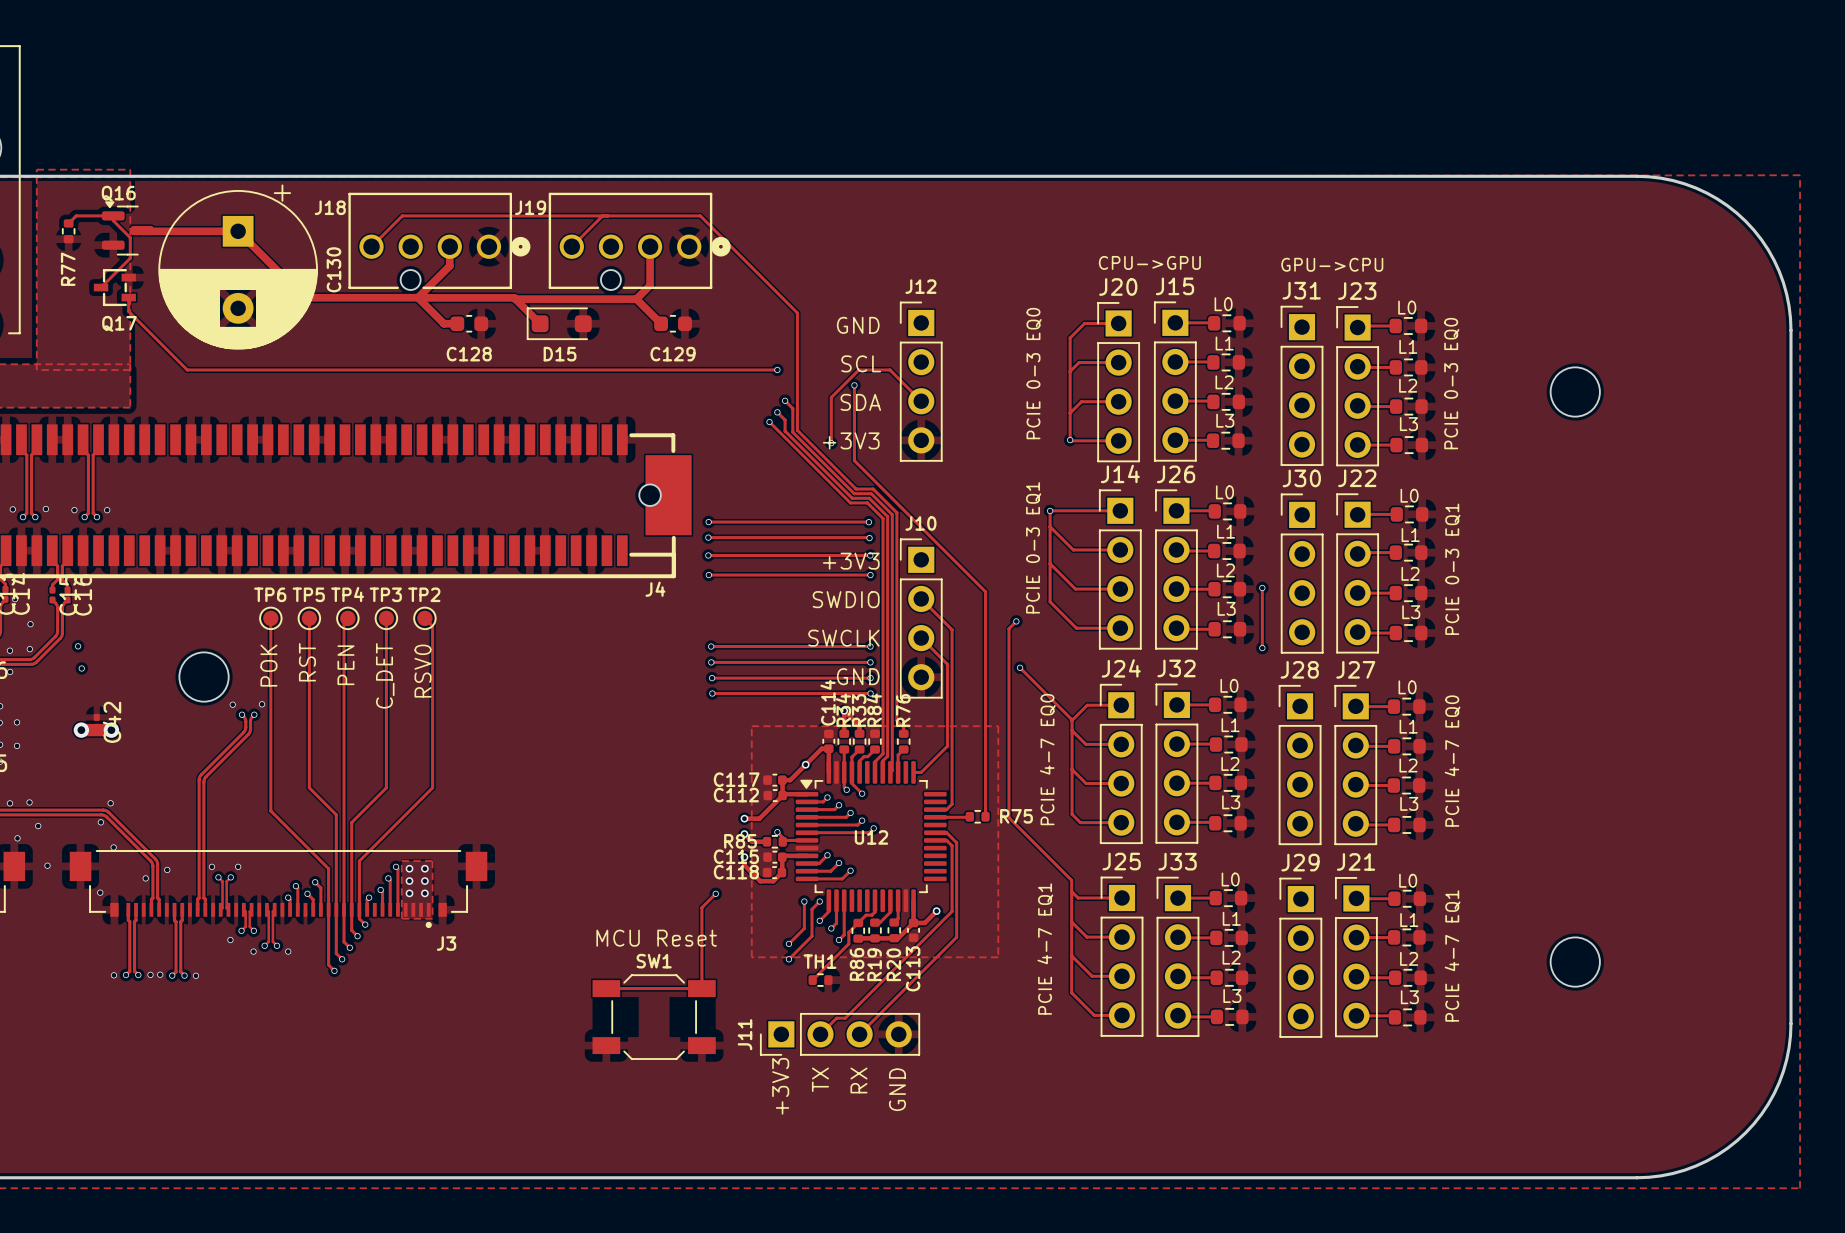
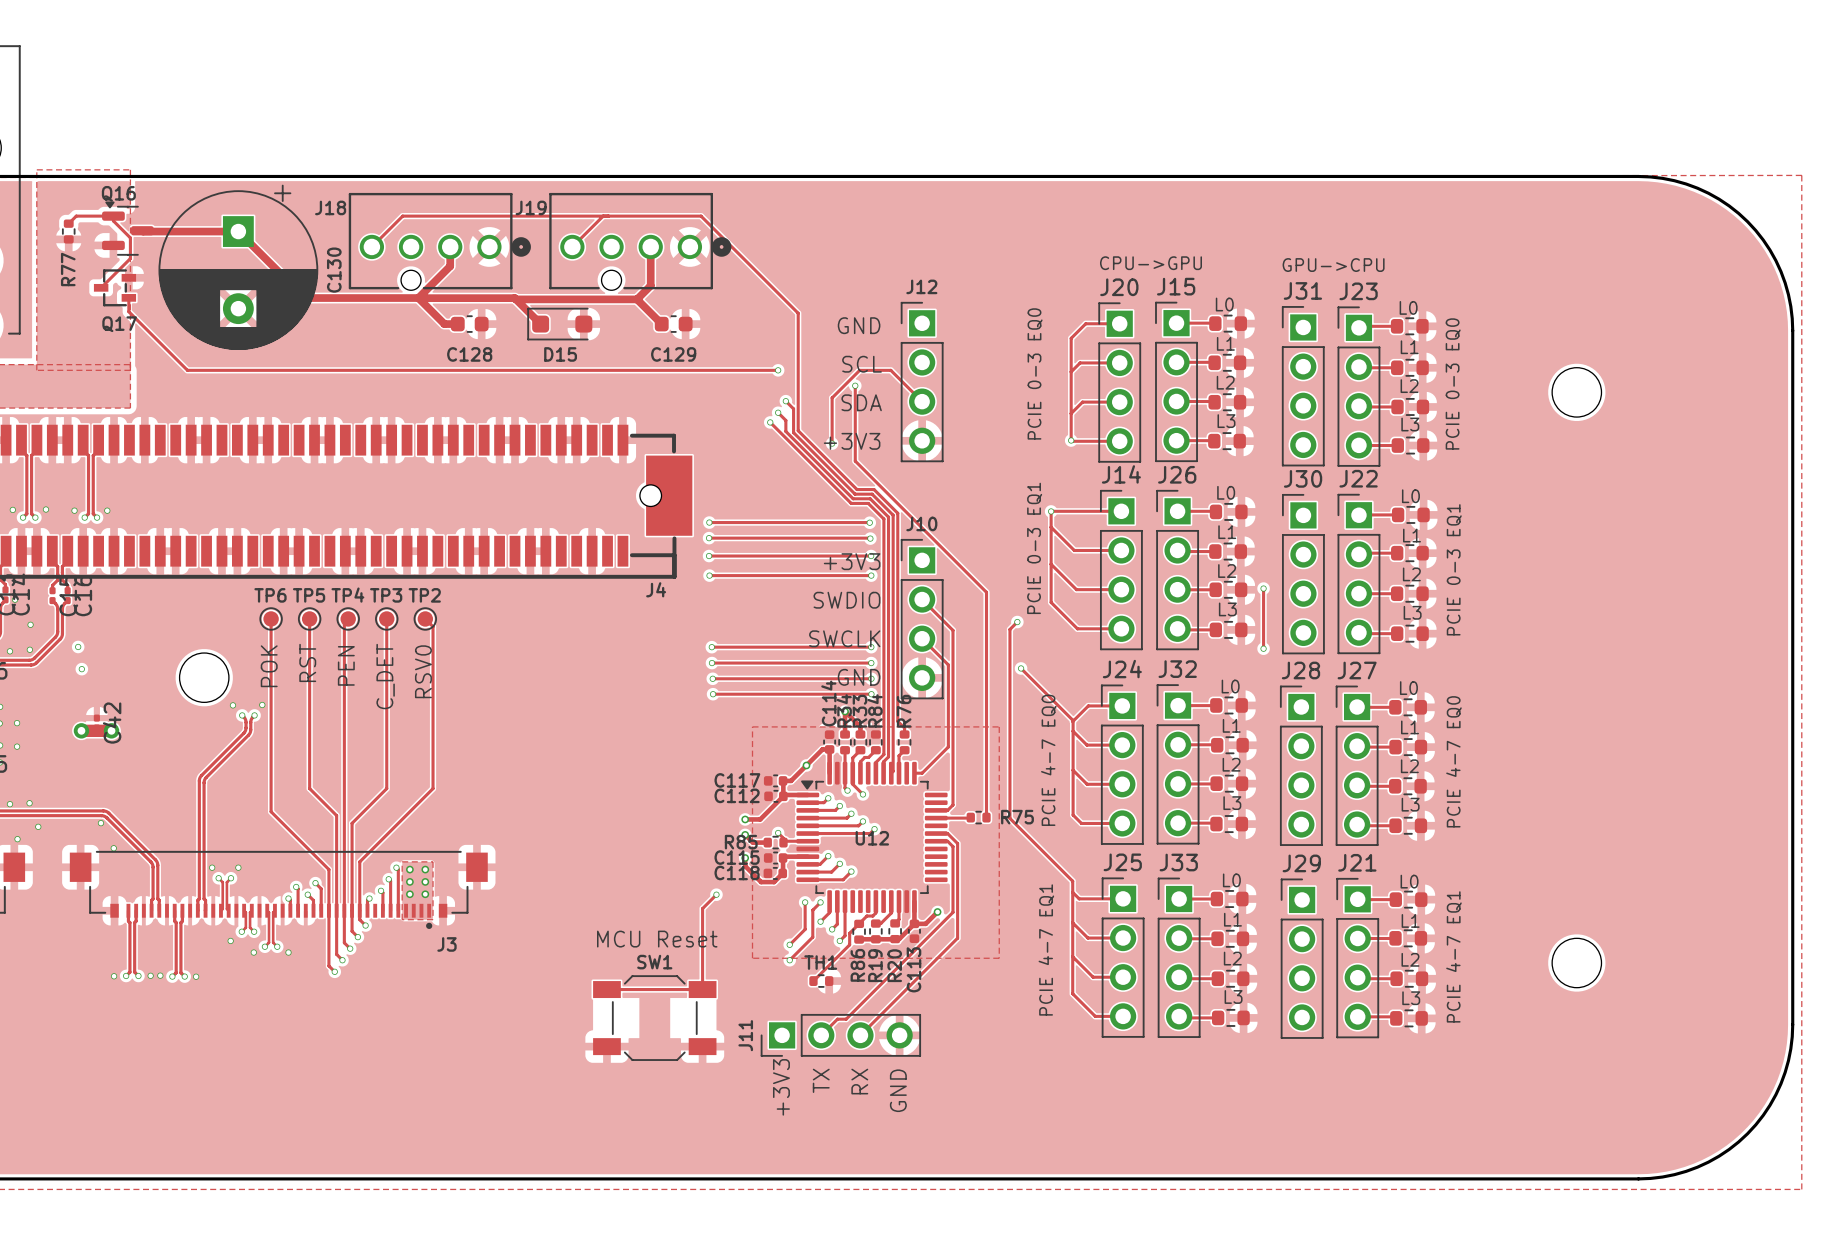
via: (10, 671) -> none
via: (110, 803) -> none
via: (47, 865) -> none
via: (167, 869) -> none
via: (145, 878) -> none
via: (100, 892) -> none

